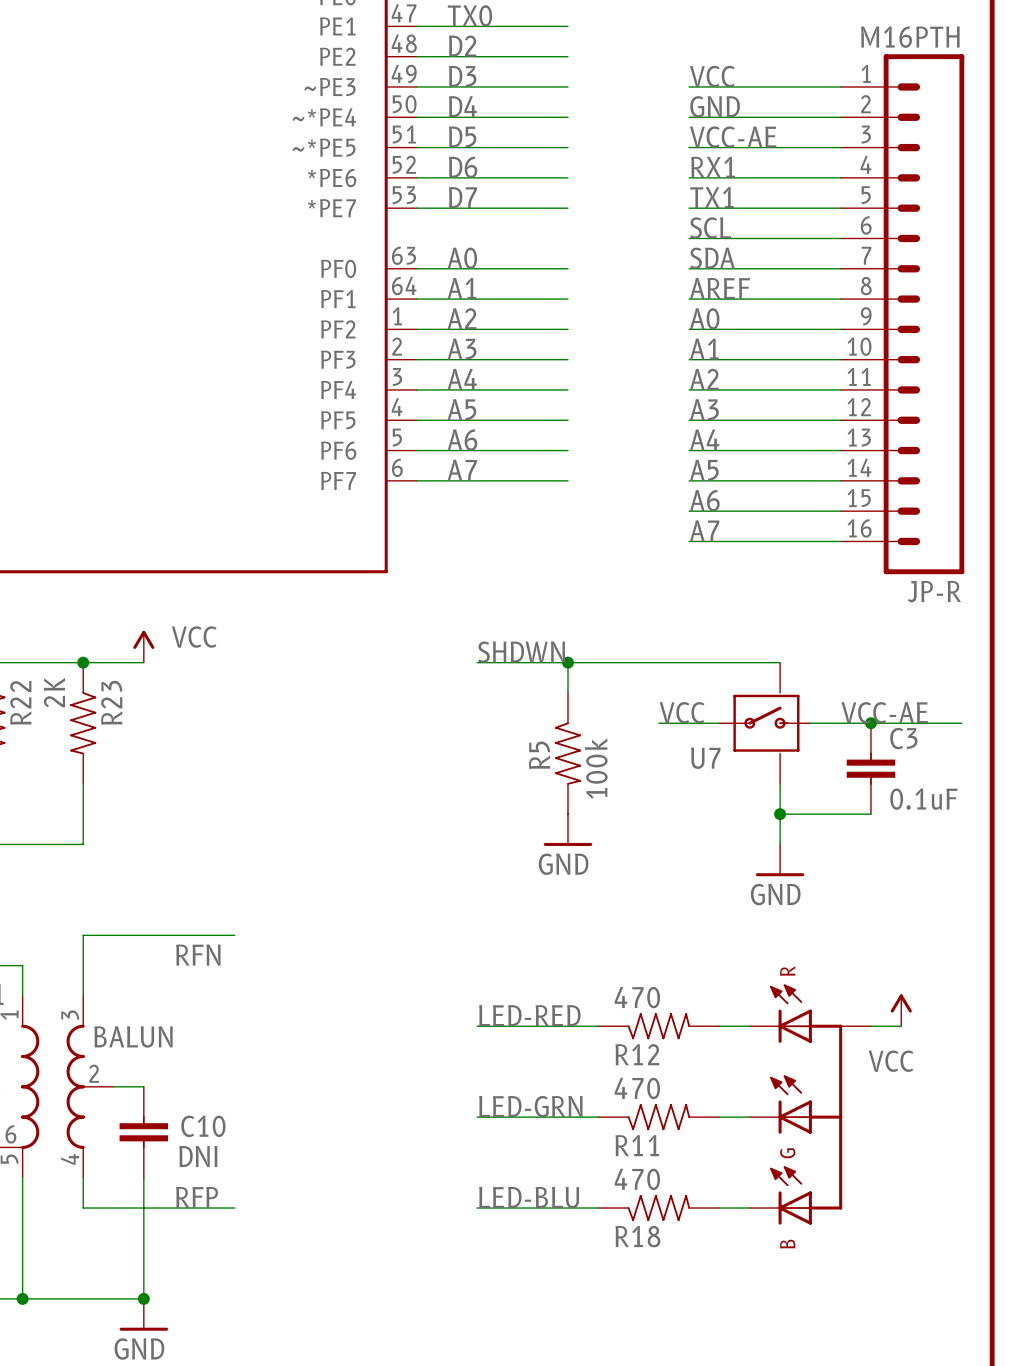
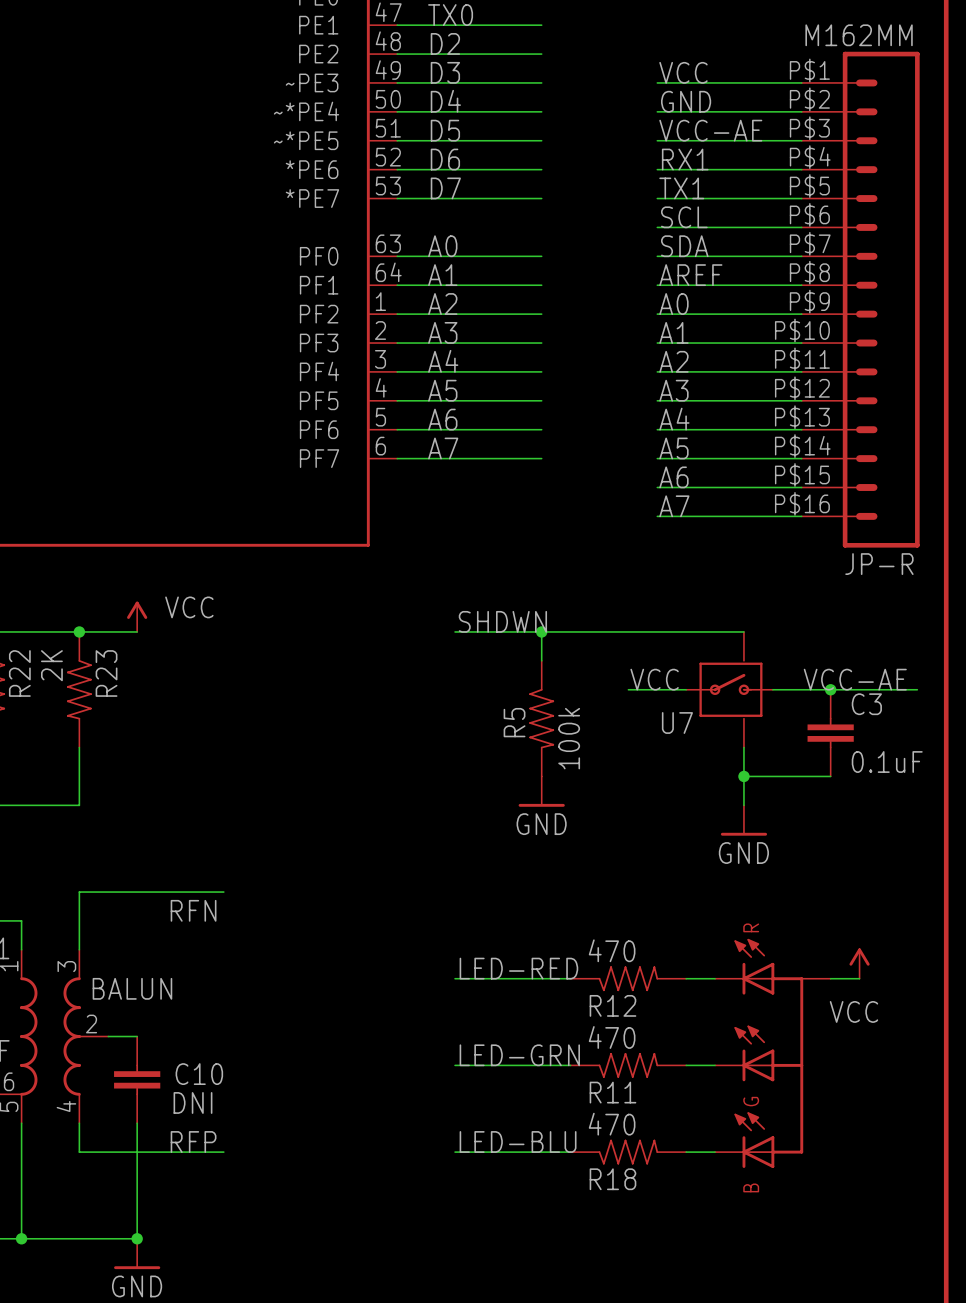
JP-R value: M16PTH (910, 37) -> M162MM (859, 35)
JP-R symbol: [840, 54, 965, 575] -> [801, 51, 920, 548]

